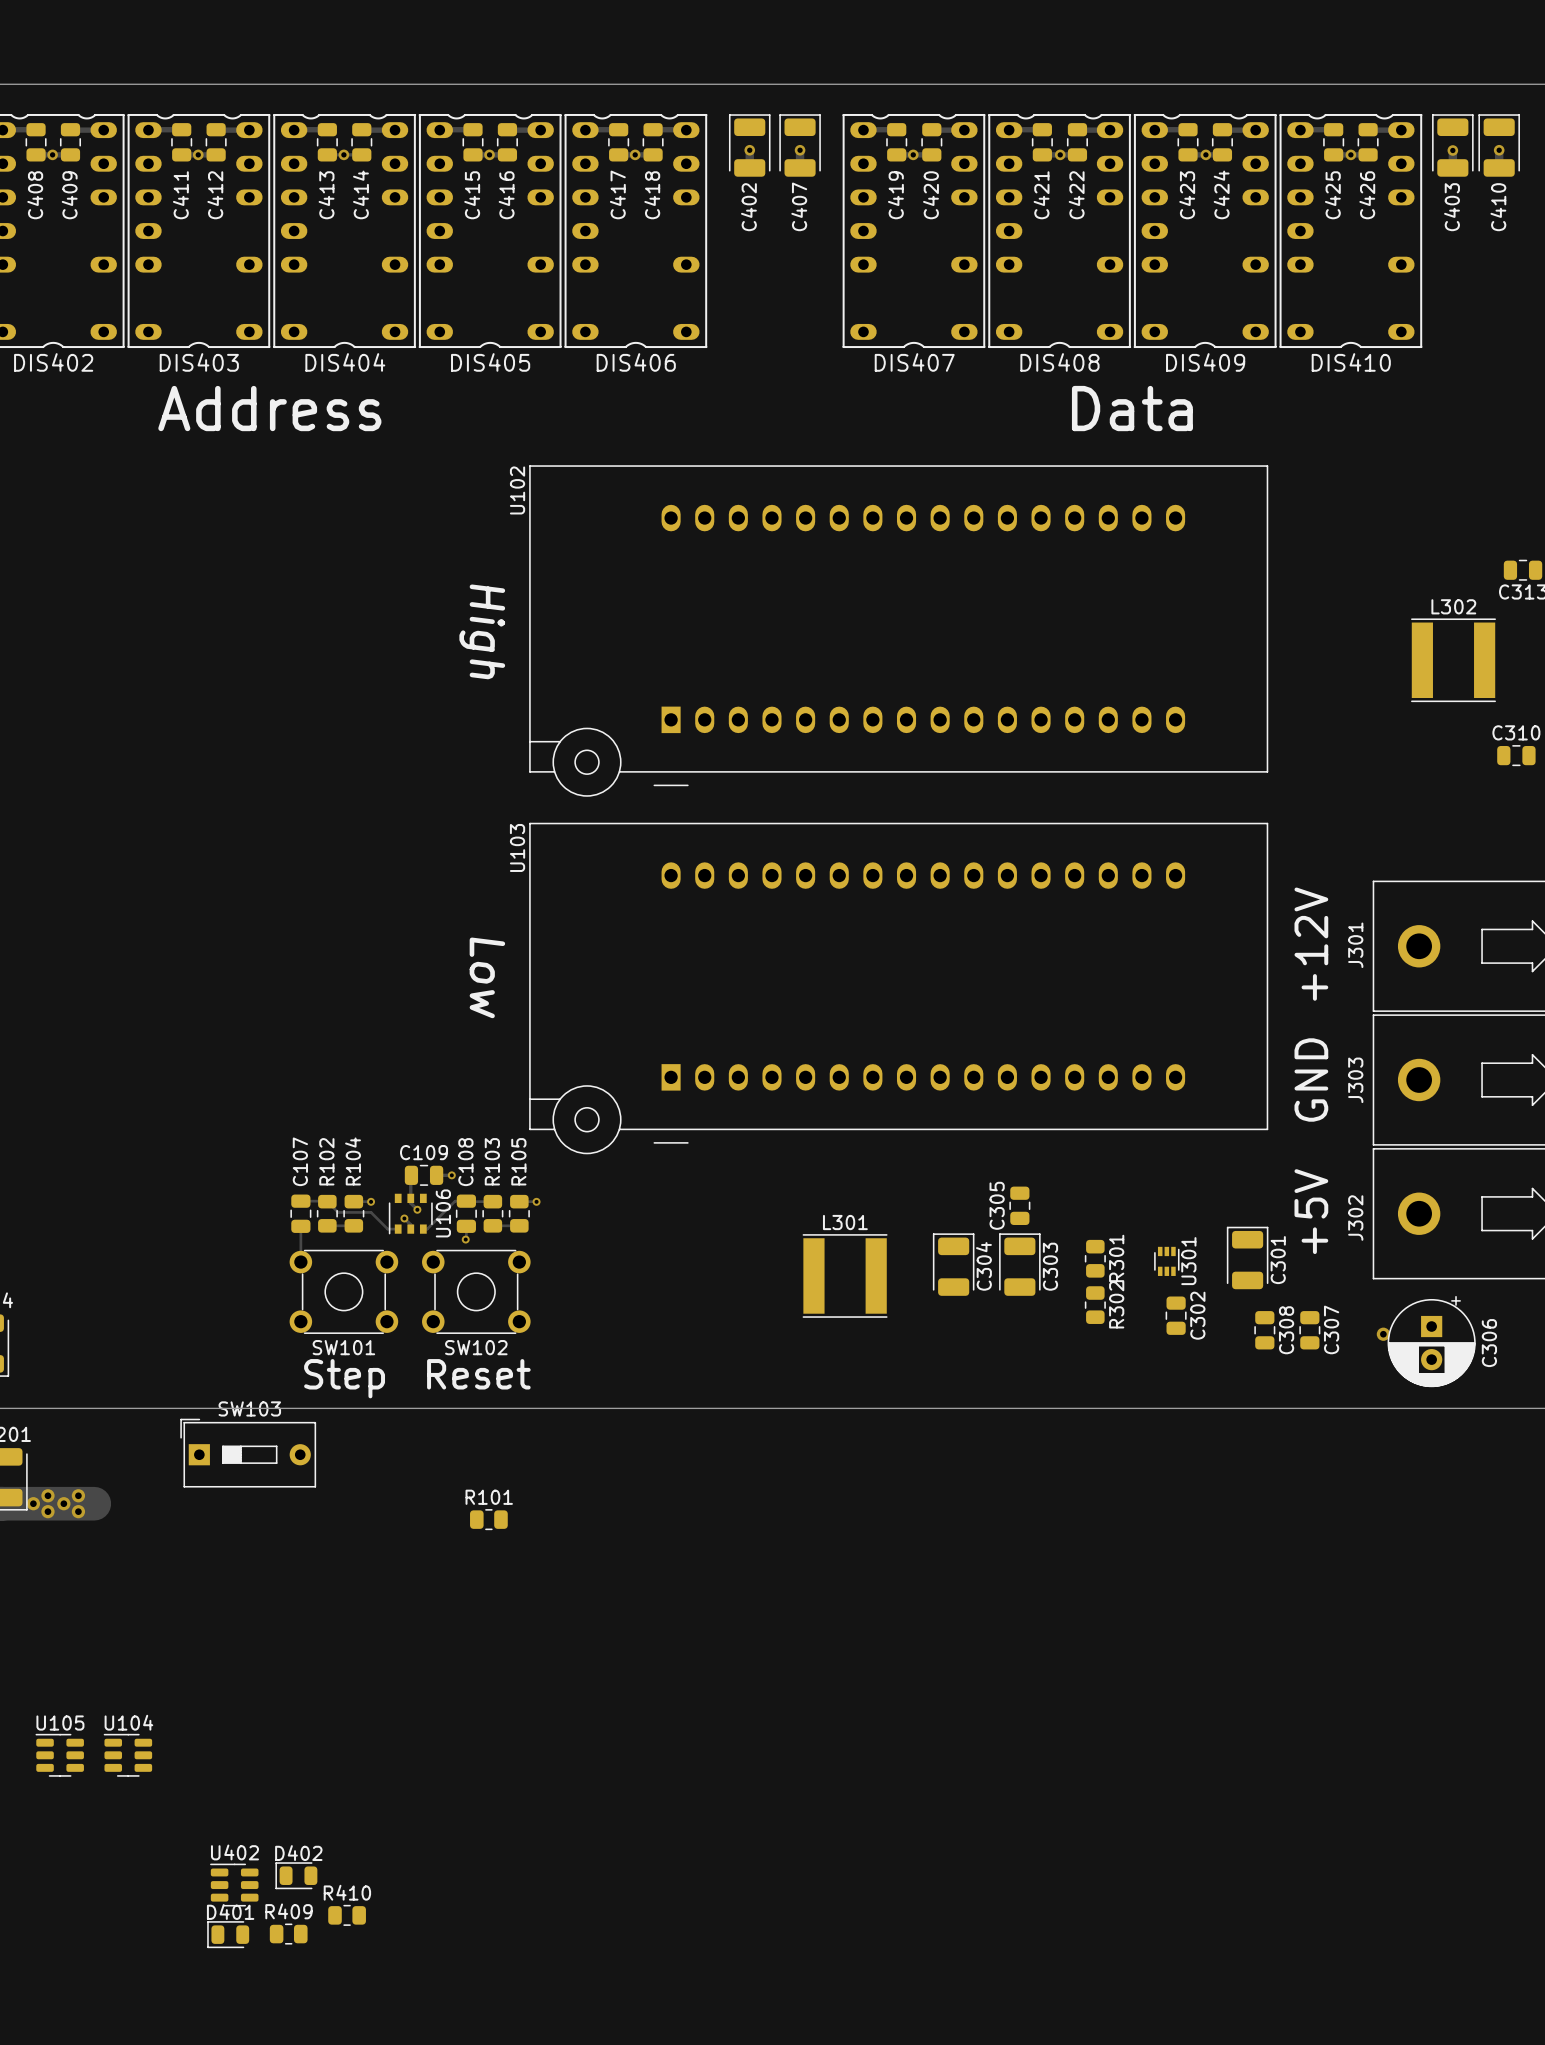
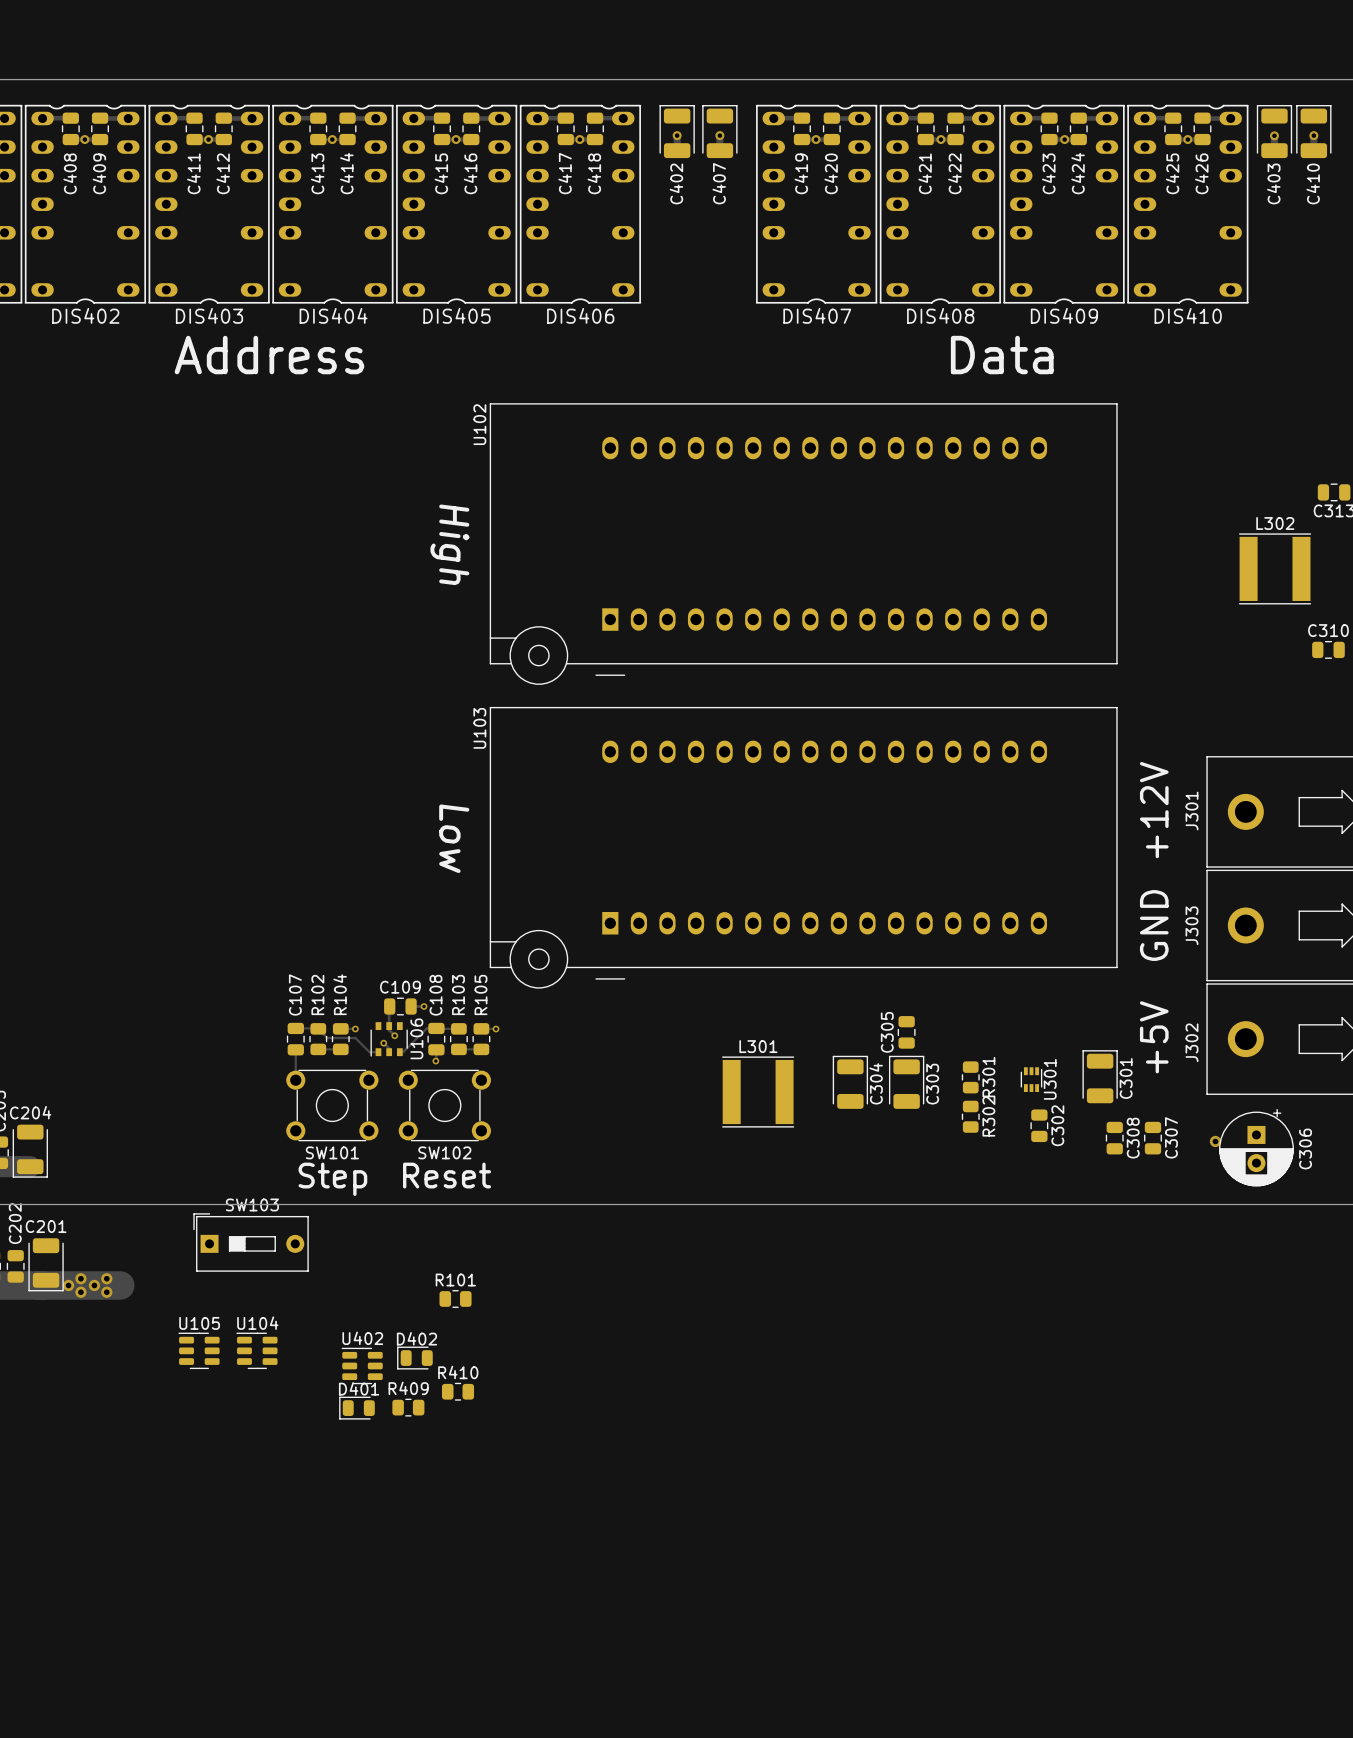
U105 position: (59, 1755) -> (199, 1350)
U104 position: (127, 1755) -> (256, 1350)
D402 position: (296, 1875) -> (414, 1358)
U402 position: (234, 1885) -> (362, 1365)
R410 position: (347, 1915) -> (458, 1391)
D401 position: (228, 1934) -> (356, 1408)
R409 position: (288, 1934) -> (408, 1407)

